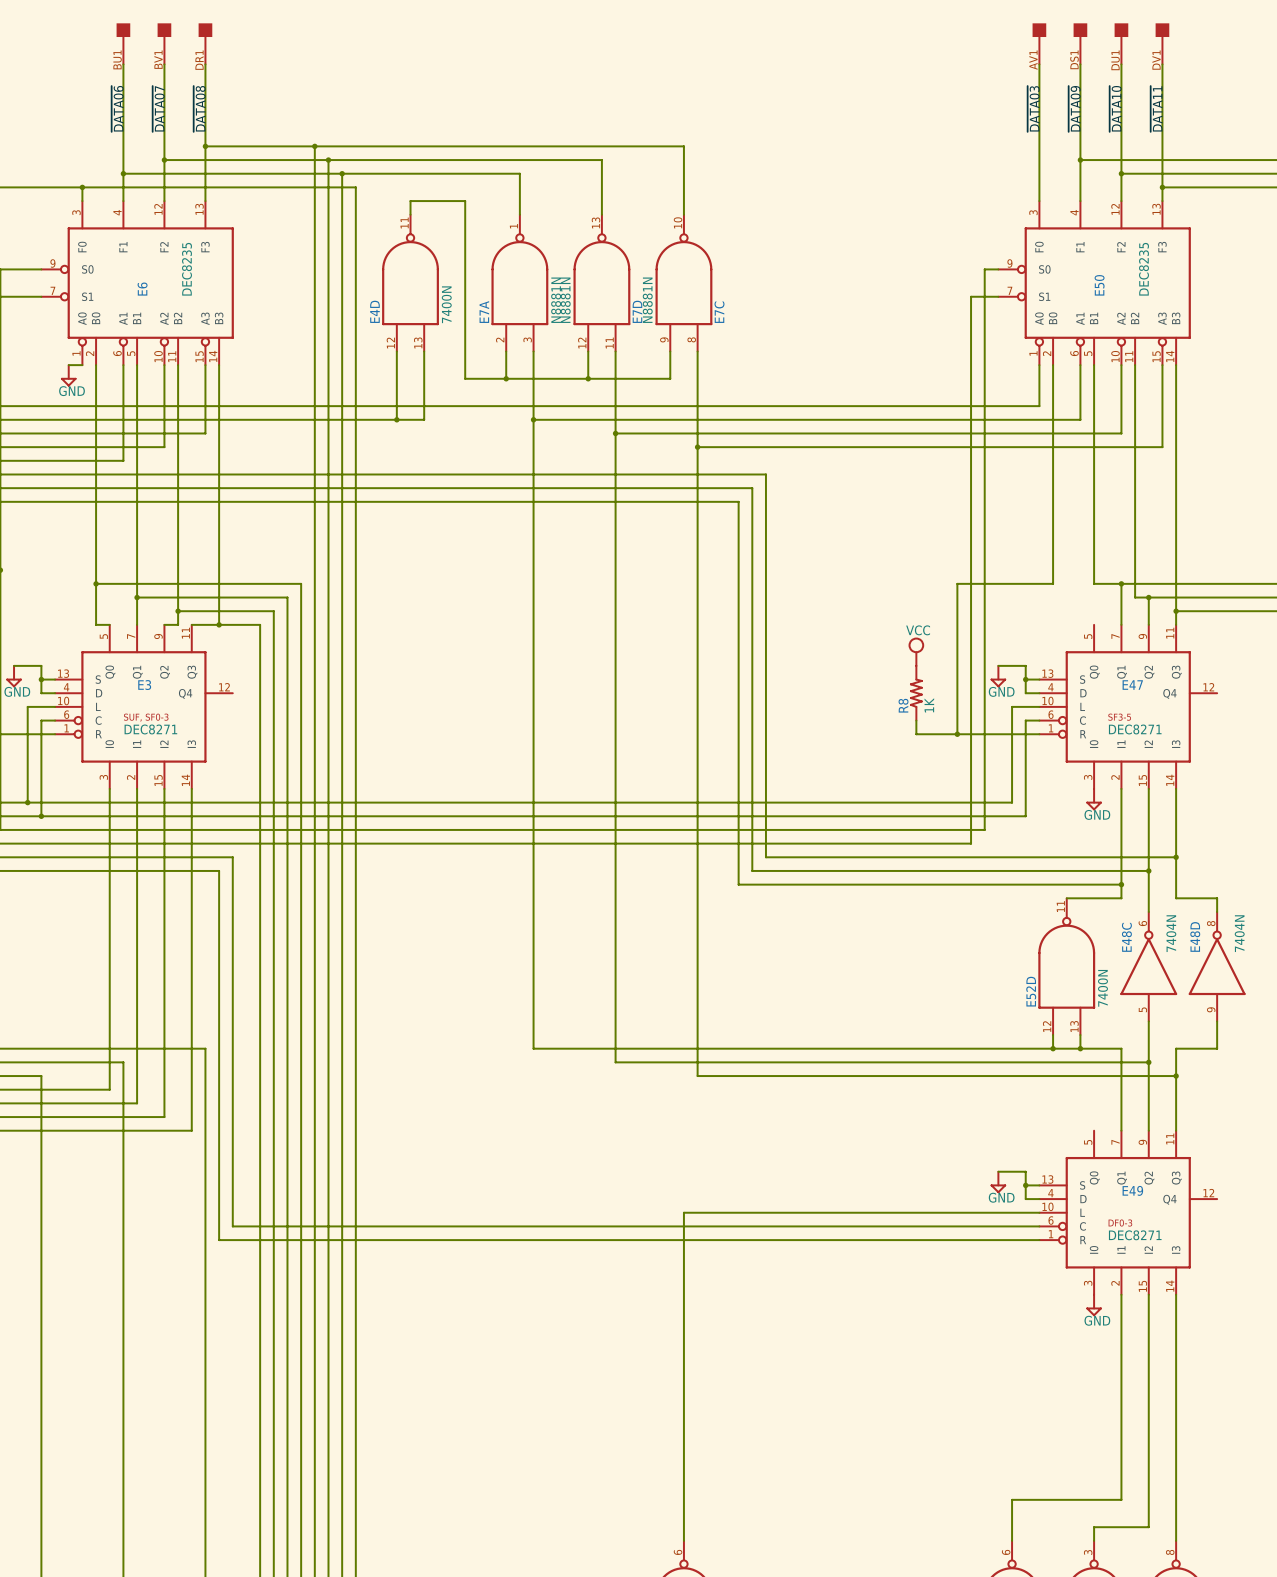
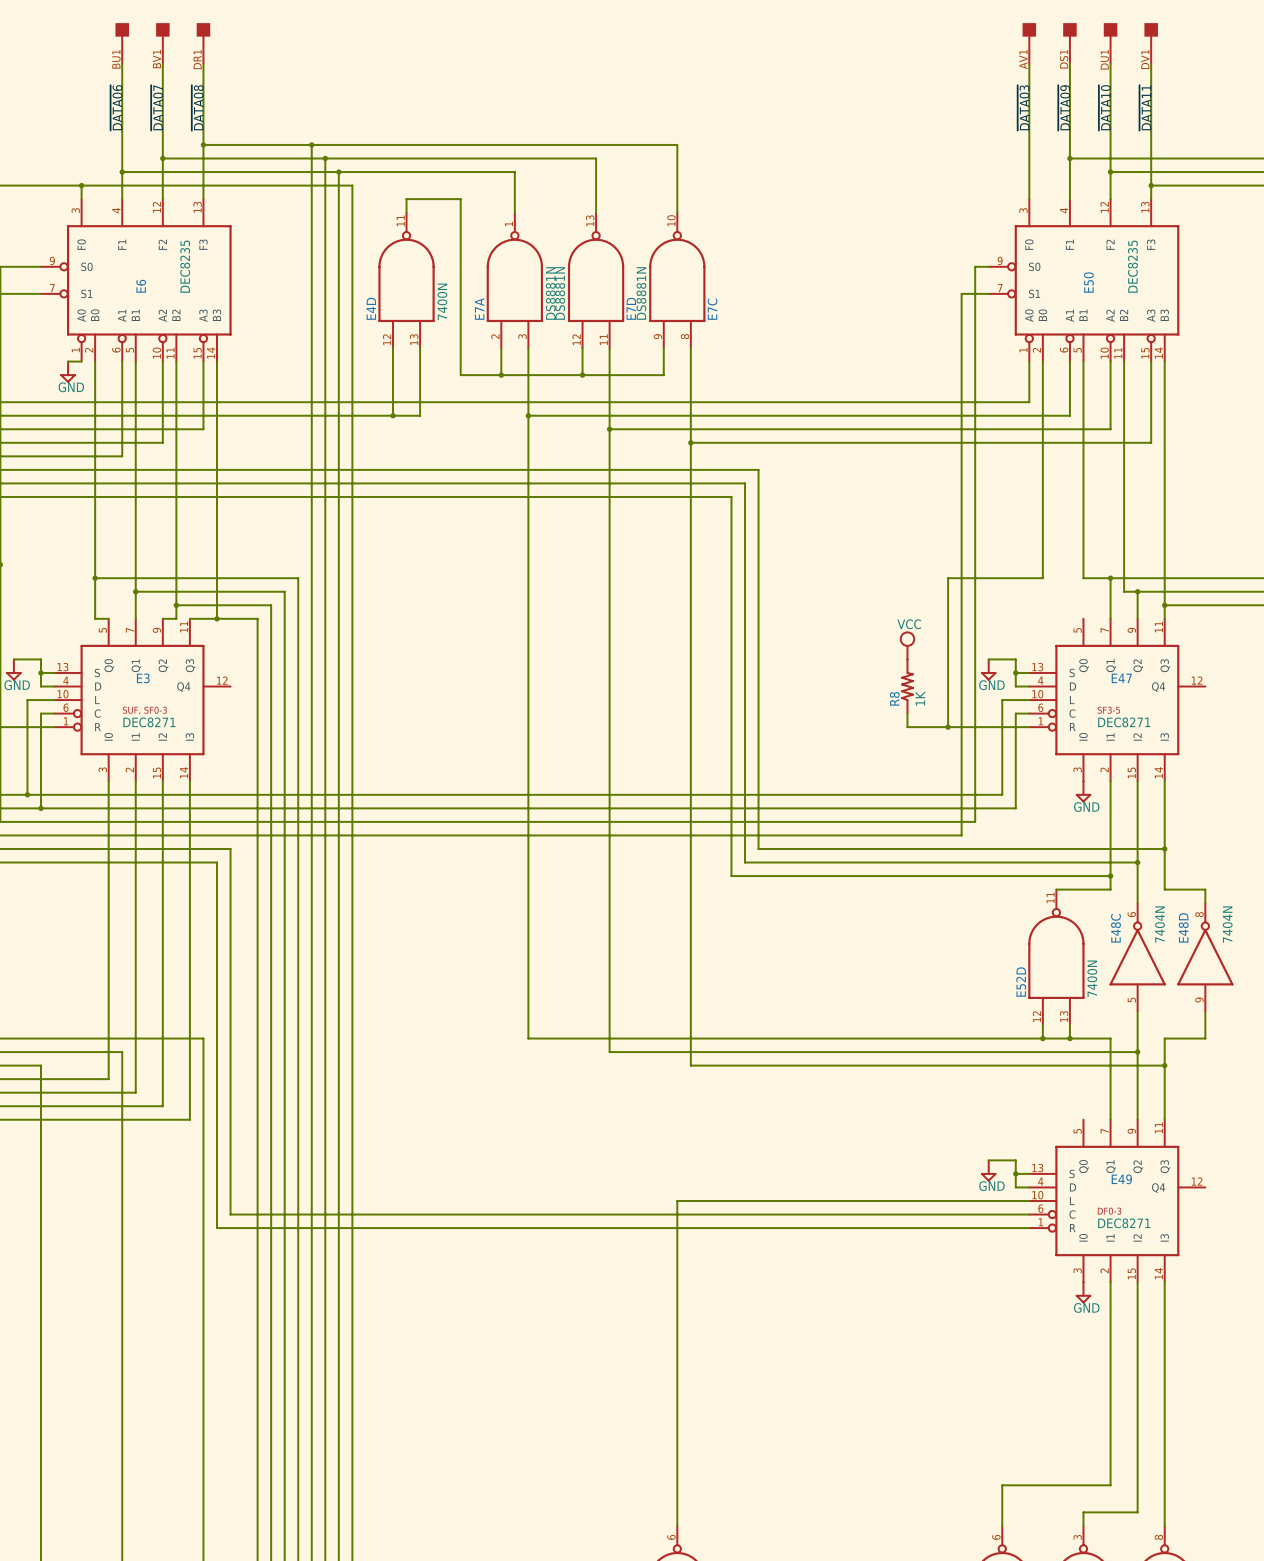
E7A value: N8881N (556, 300) -> DS8881N (550, 293)
E7D value: N8881N (565, 300) -> DS8881N (560, 293)
E7C value: N8881N (647, 300) -> DS8881N (641, 293)

